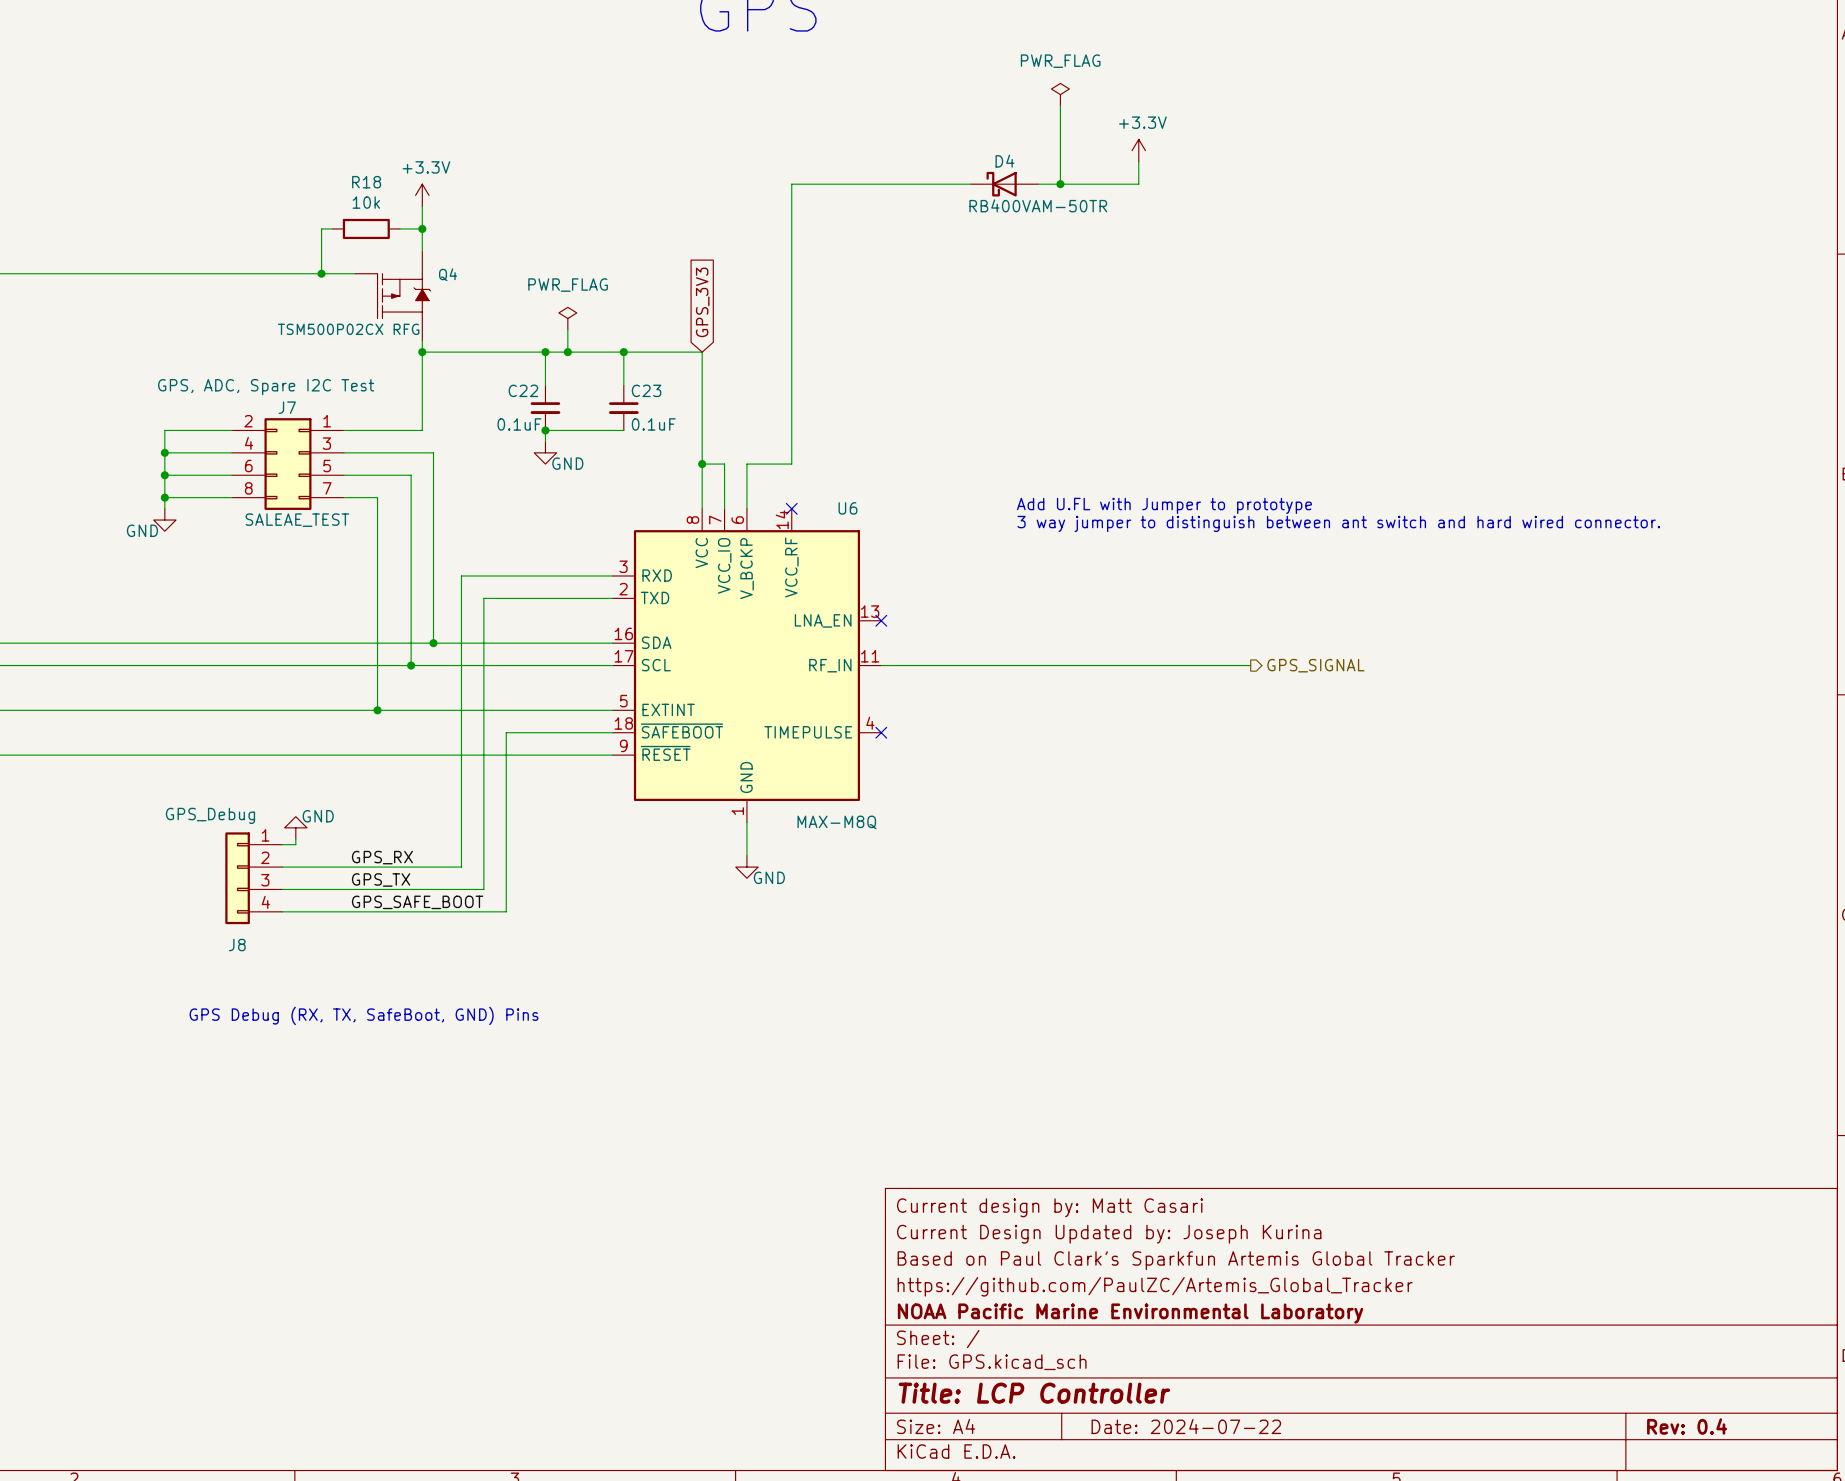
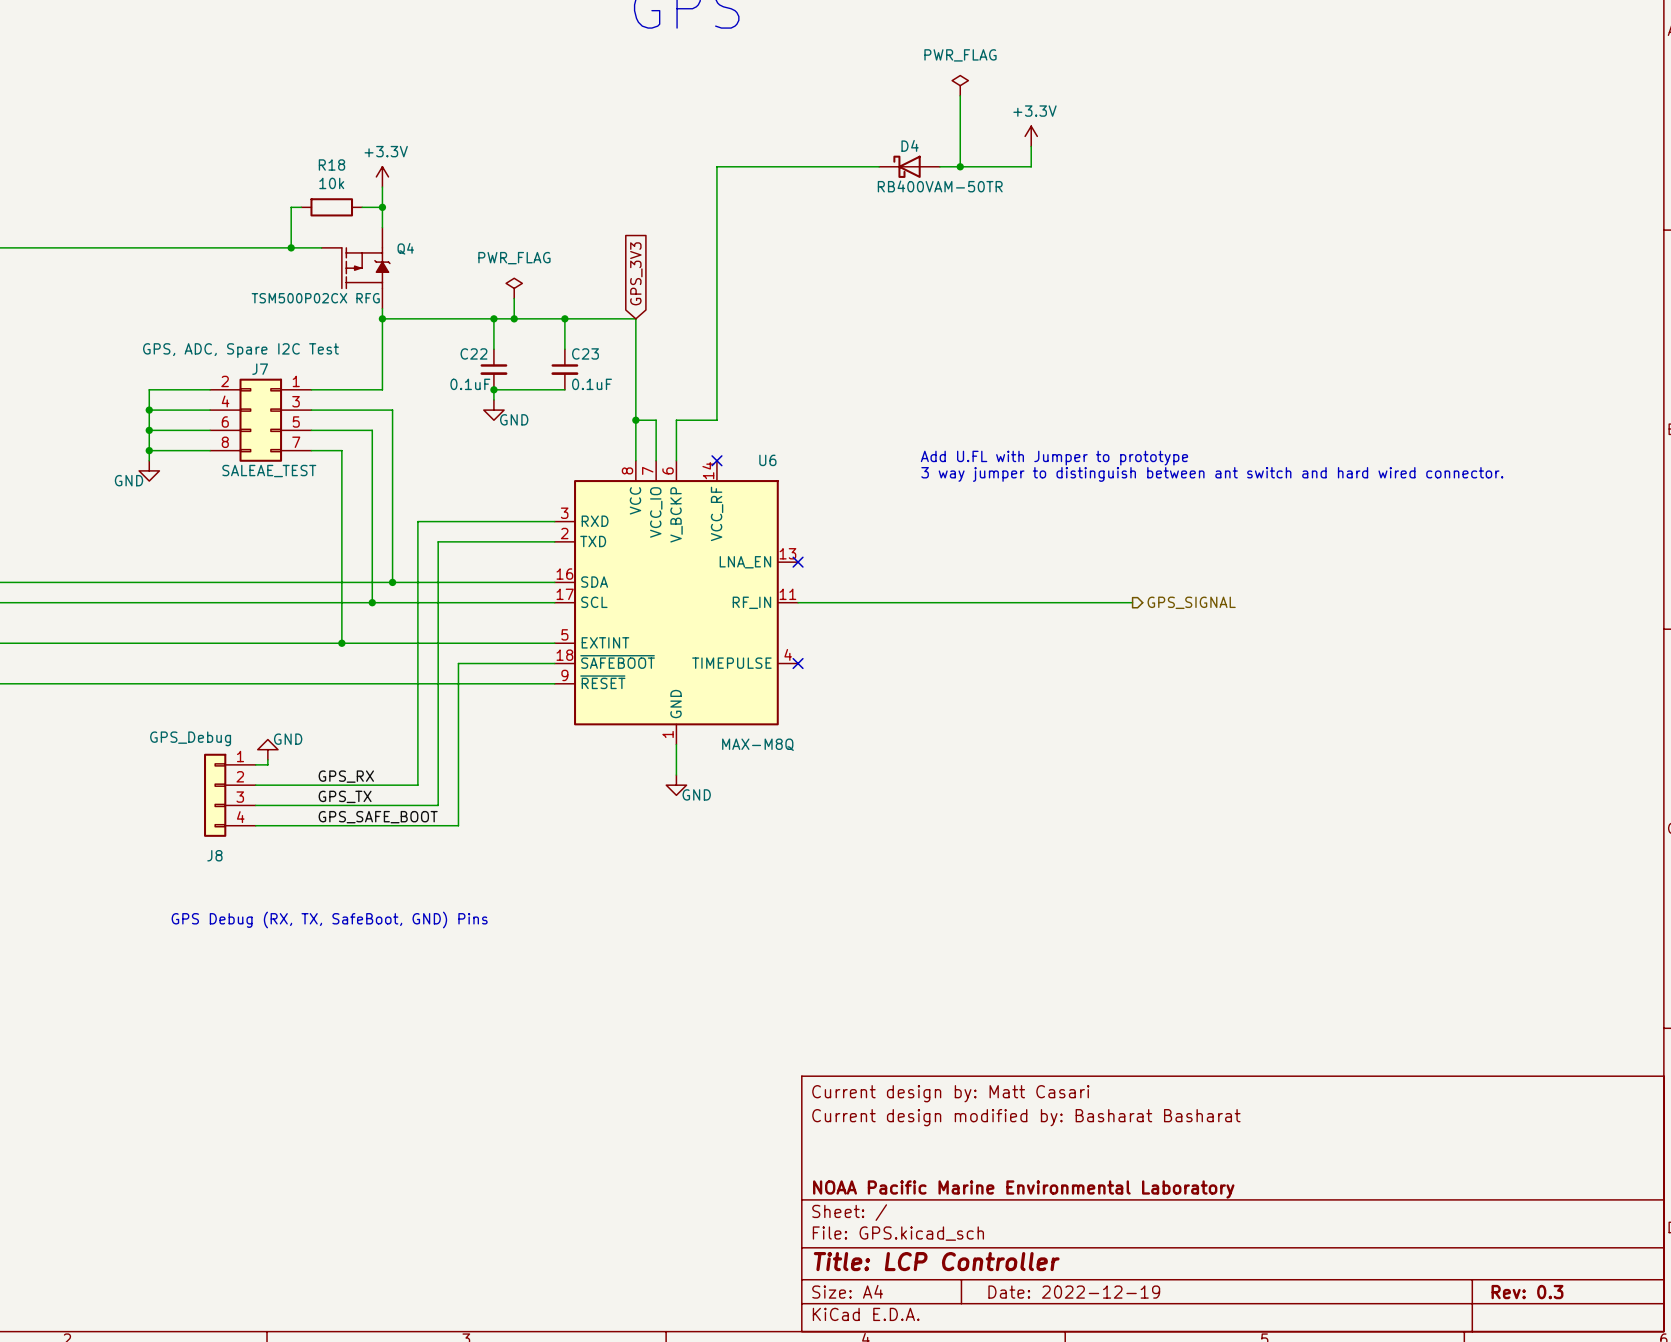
title block: Current Design Updated by: Joseph Kurina (1109, 1234) -> Current design modified by: Basharat Basharat (1026, 1117)
title block: Based on Paul Clark's Sparkfun Artemis Global Tracker (1176, 1260) -> none
title block: https://github.com/PaulZC/Artemis_Global_Tracker (1155, 1286) -> none
title block: Date: 2024-07-22 (1186, 1426) -> Date: 2022-12-19 (1074, 1292)
title block: Rev: 0.4 (1687, 1426) -> Rev: 0.3 (1527, 1292)

